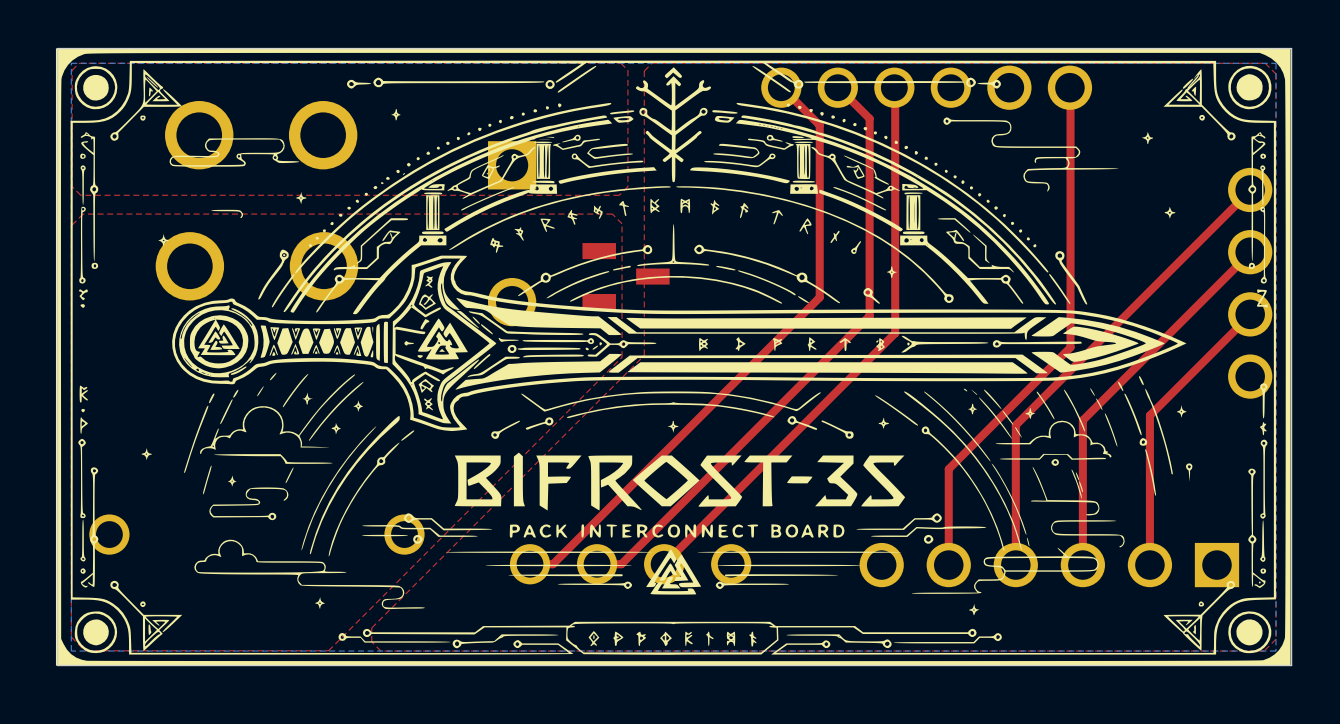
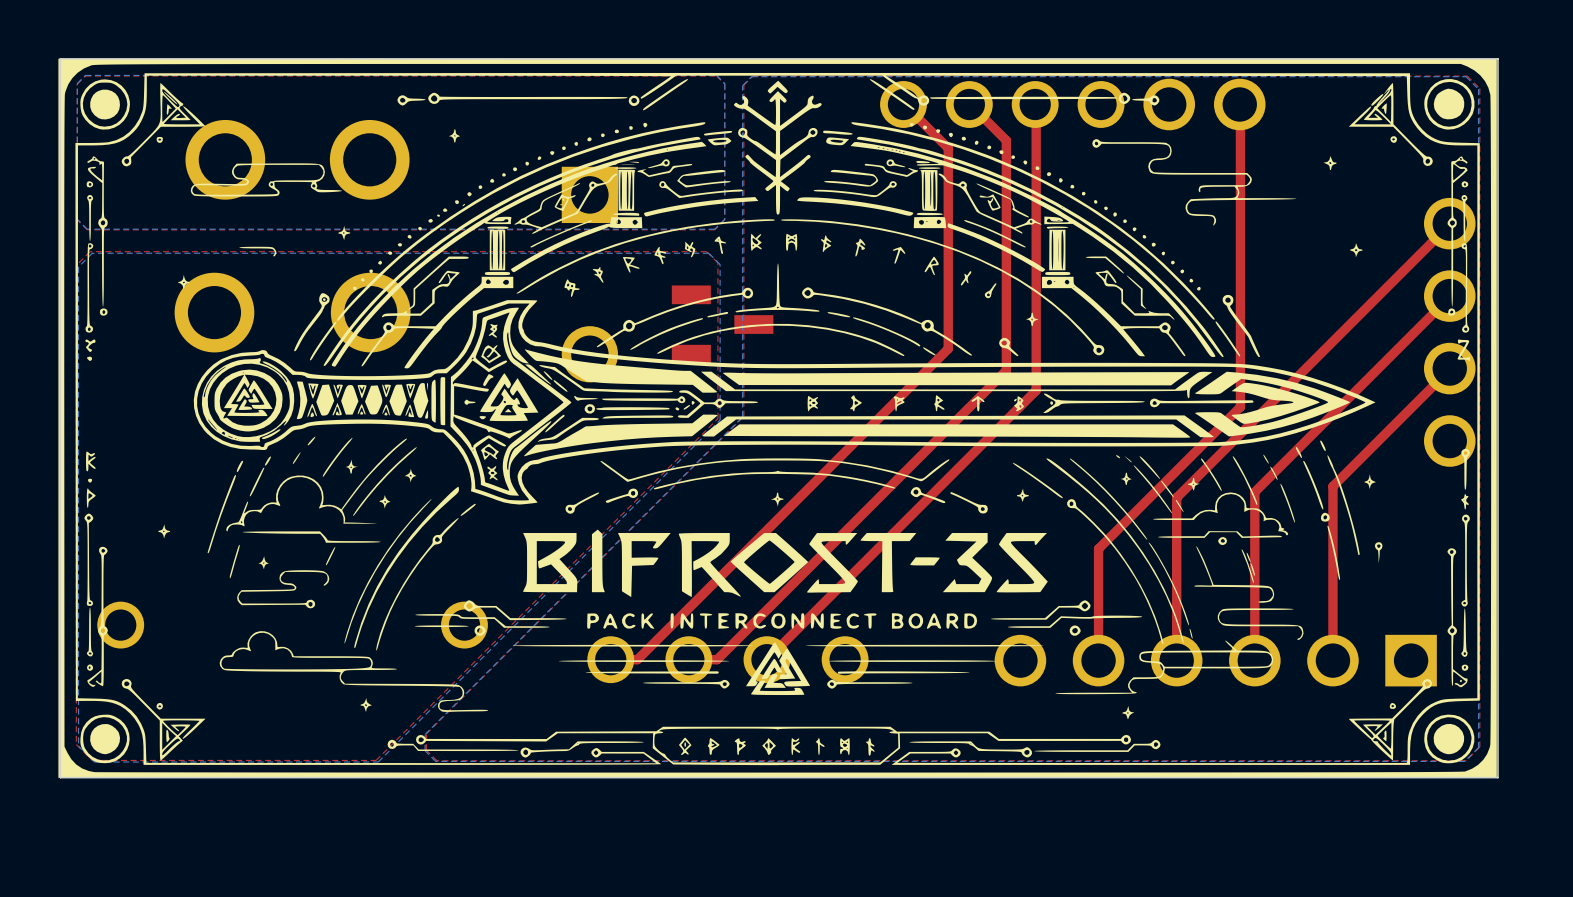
bottom zone outline: none -> (716, 75) (85, 75) (77, 83) (77, 219) (87, 229) (714, 229) (724, 219) (724, 83) (716, 75)
bottom zone outline: (1276, 63) (1276, 651) (71, 651) (71, 63) (1276, 63) -> (1466, 76) (1478, 89) (1478, 747) (1464, 761) (435, 761) (425, 750) (425, 734) (742, 417) (742, 85) (751, 76) (1466, 76)
bottom zone outline: none -> (708, 253) (92, 253) (78, 267) (78, 746) (94, 762) (378, 762) (720, 420) (720, 264) (708, 253)

